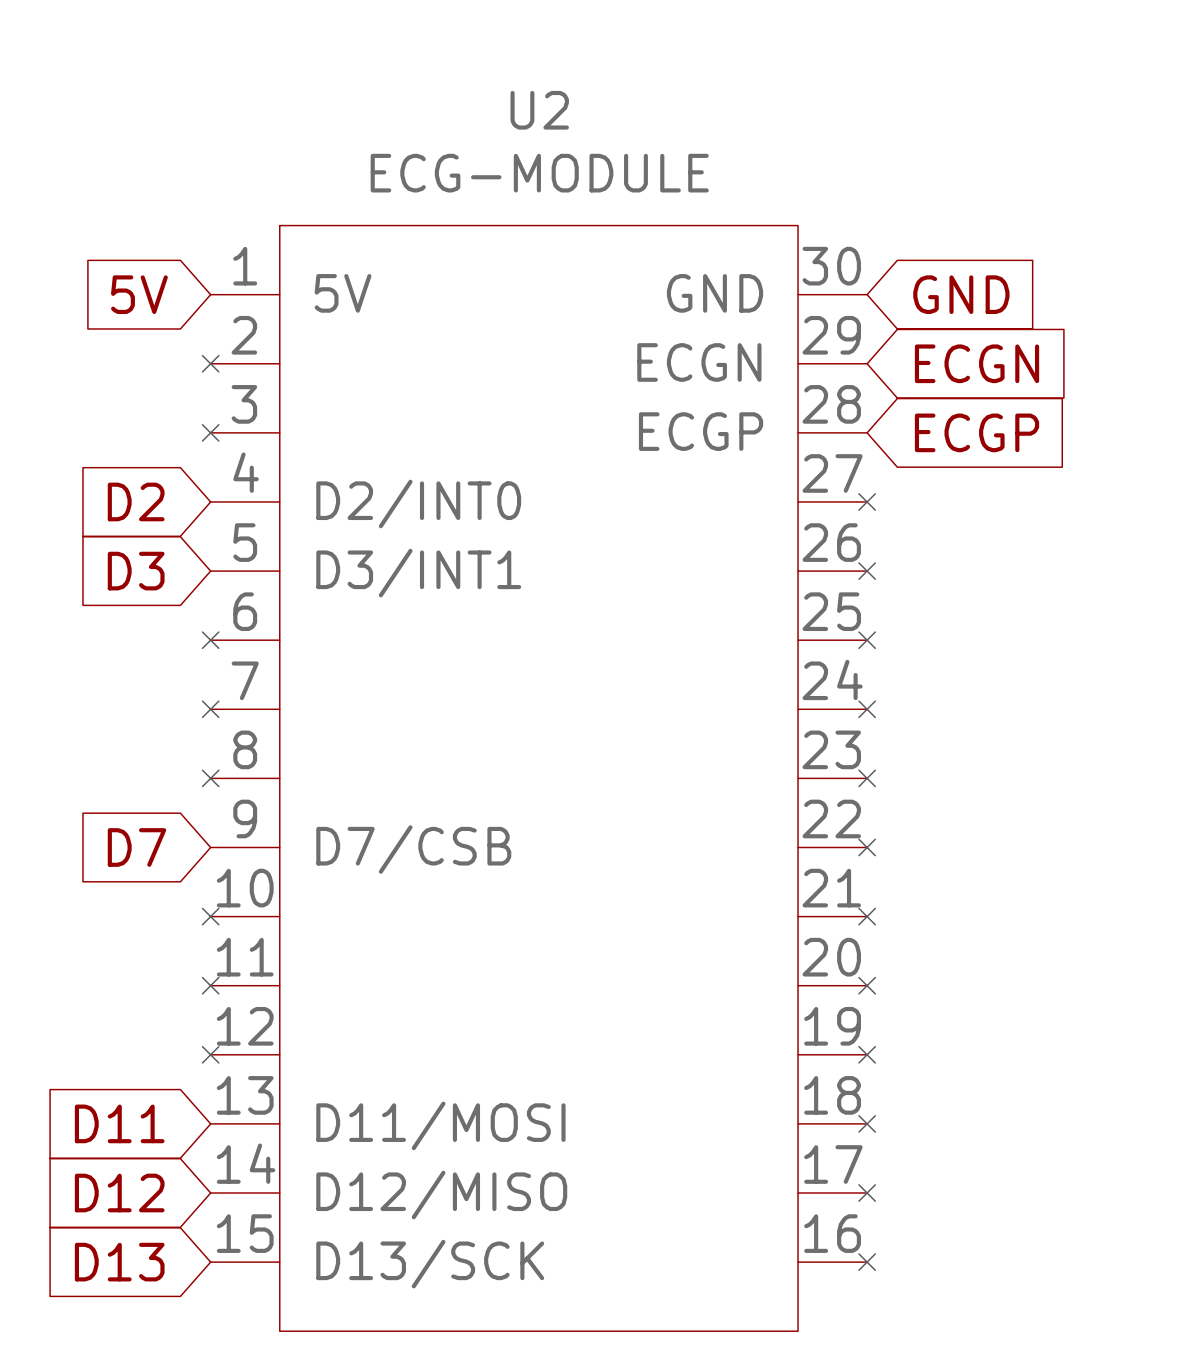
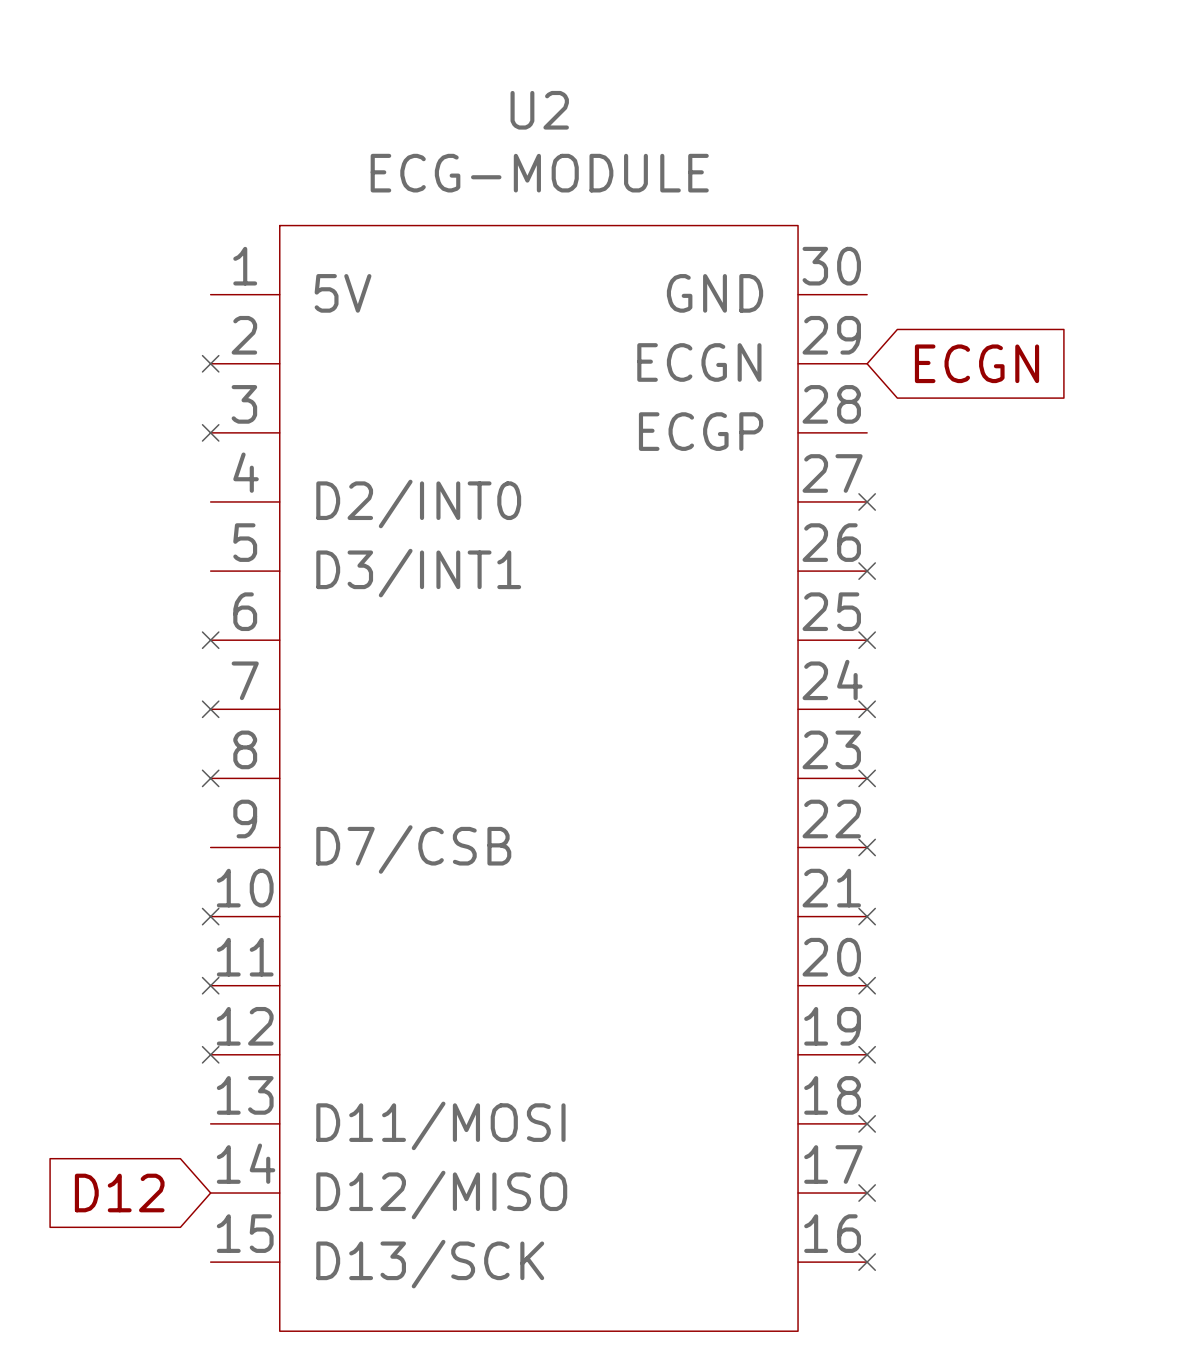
global label: 5V (139, 294) -> none
global label: GND (961, 294) -> none
global label: ECGP (977, 432) -> none
global label: D2 (136, 501) -> none
global label: D3 (136, 571) -> none
global label: D7 (136, 847) -> none
global label: D11 (119, 1123) -> none
global label: D13 (119, 1262) -> none

